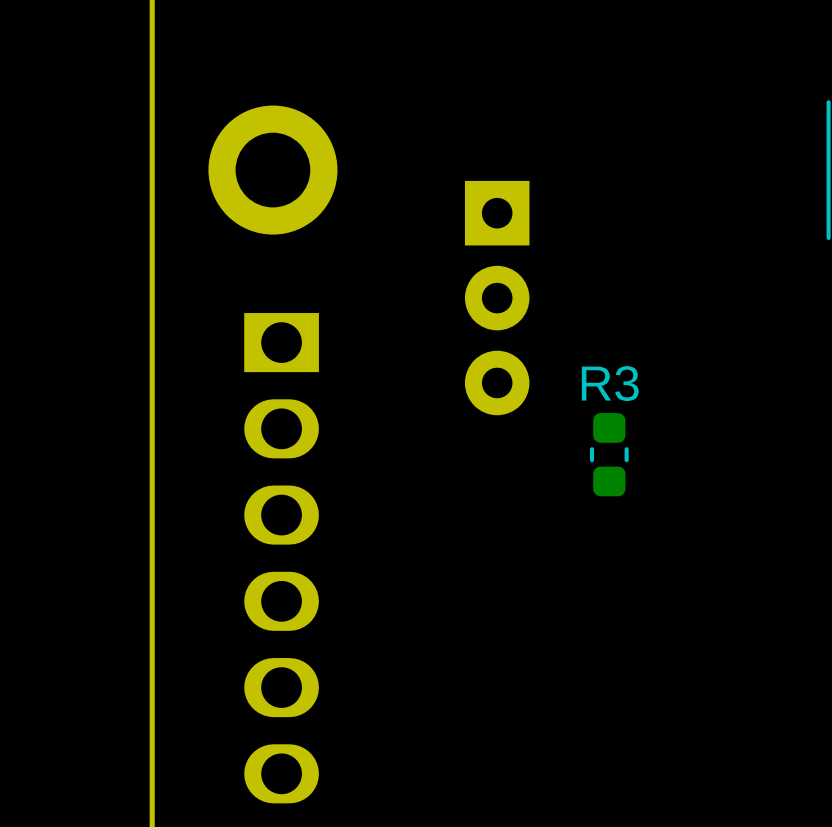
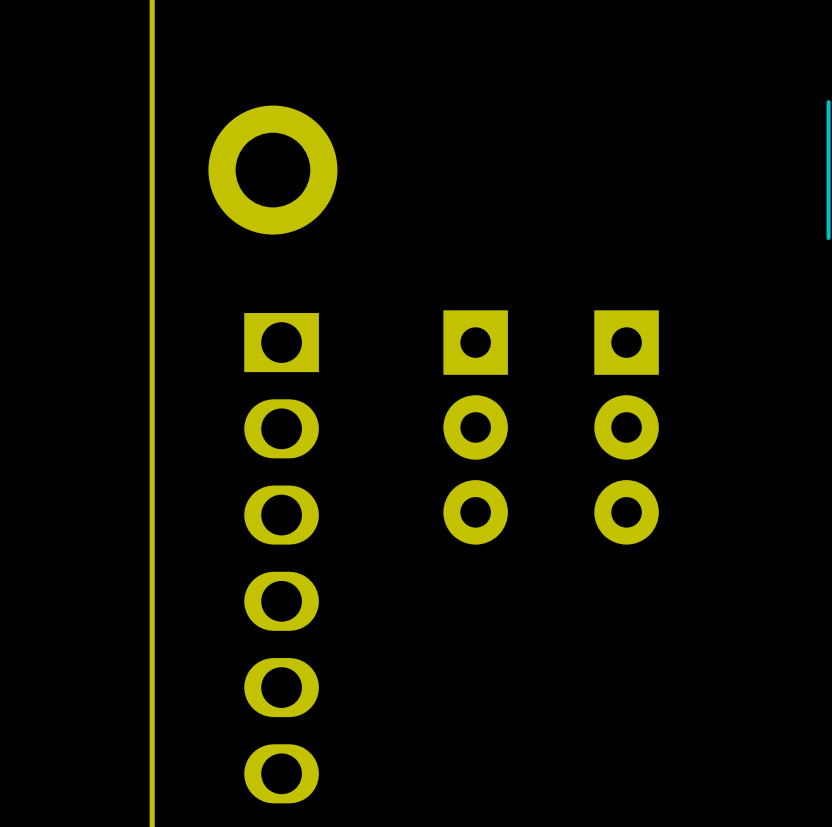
part: (497, 298) -> none
part: none -> (475, 427)
part: none -> (626, 427)
R3: (609, 454) -> none

